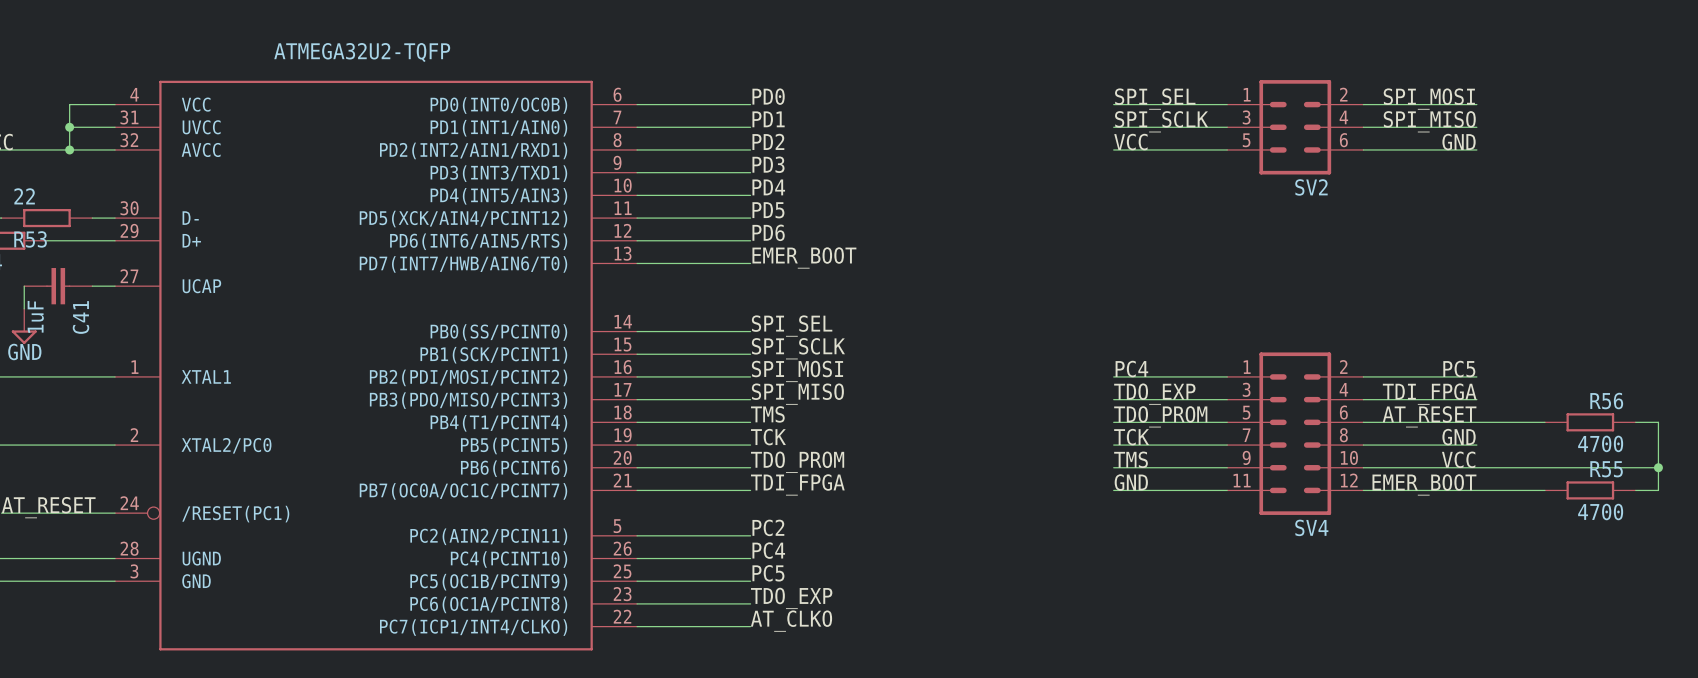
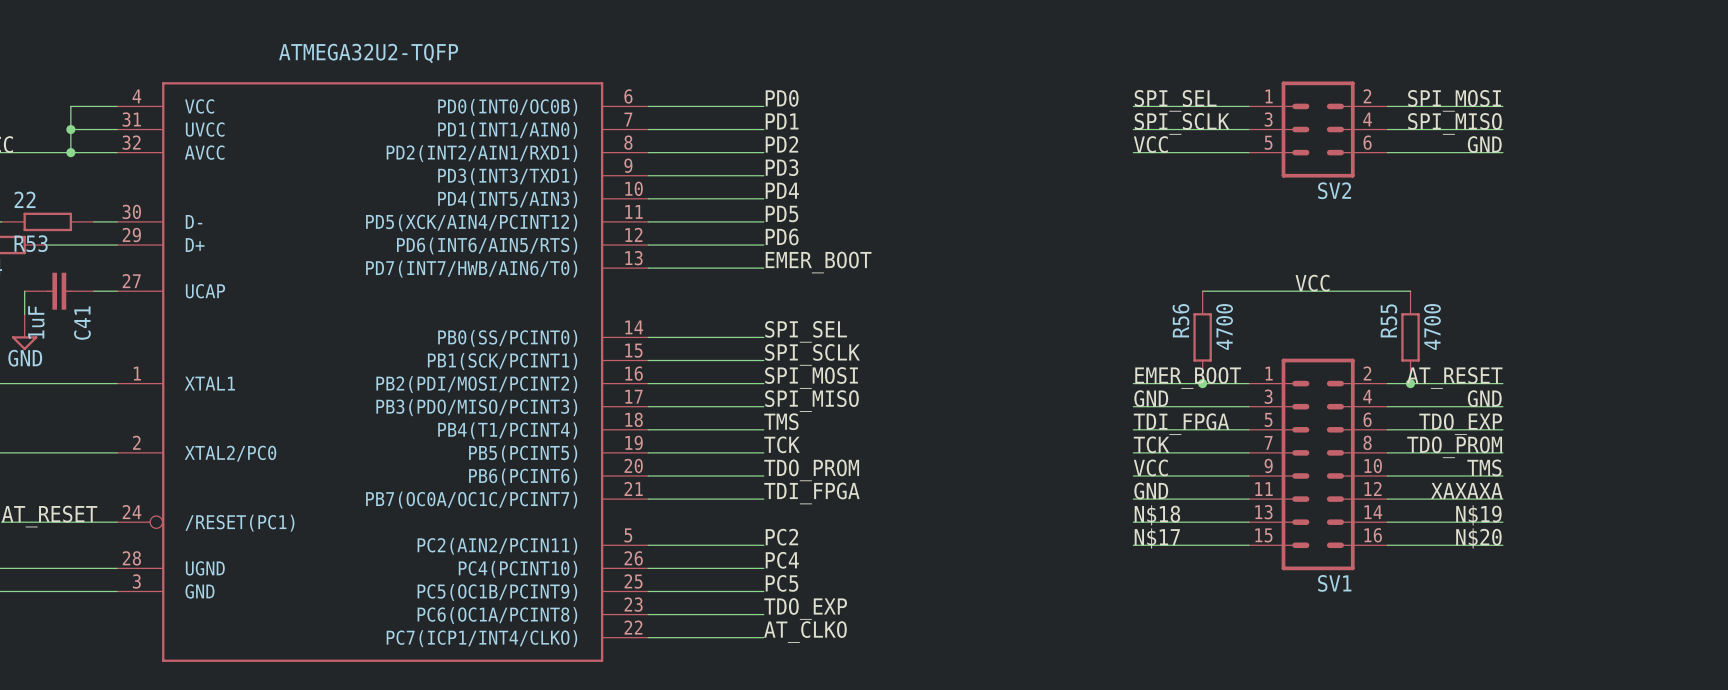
label: none -> VCC (1312, 283)
wire: none -> (1202, 291) (1410, 291)
label: PC4 (1131, 369) -> EMER_BOOT (1188, 377)
label: PC5 (1459, 369) -> AT_RESET (1454, 377)
junction: none -> (1202, 383)
junction: none -> (1410, 383)
label: TDO_EXP (1154, 394) -> GND (1151, 398)
label: TDI_FPGA (1429, 394) -> GND (1484, 398)
R56 name position: R56 (1606, 401) -> R56 (1180, 320)
label: TDO_PROM (1160, 416) -> TDI_FPGA (1181, 424)
label: AT_RESET (1429, 416) -> TDO_EXP (1460, 424)
wire: (1476, 422) (1544, 422) -> none
R56 rotation: 0° (1590, 422) -> 90° clockwise (1202, 337)
R56 position: (1590, 422) -> (1202, 337)
wire: (1635, 422) (1658, 422) (1658, 490) (1635, 490) -> none
SV4: (1295, 433) -> none
label: GND (1459, 437) -> TDO_PROM (1454, 447)
R56 value position: 4700 (1600, 443) -> 4700 (1224, 326)
SV1: none -> (1318, 464)
label: TMS (1131, 459) -> VCC (1150, 467)
label: VCC (1458, 459) -> TMS (1484, 467)
wire: (1476, 467) (1658, 467) -> none
junction: (1658, 467) -> none
R55 name position: R55 (1606, 469) -> R55 (1388, 320)
label: EMER_BOOT (1424, 484) -> XAXAXA (1466, 491)
wire: (1476, 490) (1544, 490) -> none
R55 rotation: 0° (1590, 490) -> 90° clockwise (1410, 337)
R55 position: (1590, 490) -> (1410, 337)
label: none -> N$18 (1157, 515)
label: none -> N$19 (1478, 515)
R55 value position: 4700 (1600, 512) -> 4700 (1432, 326)
wire: none -> (1133, 522) (1248, 522)
wire: none -> (1387, 522) (1502, 522)
label: none -> N$17 (1157, 538)
label: none -> N$20 (1478, 538)
wire: none -> (1133, 545) (1248, 545)
wire: none -> (1387, 545) (1502, 545)

